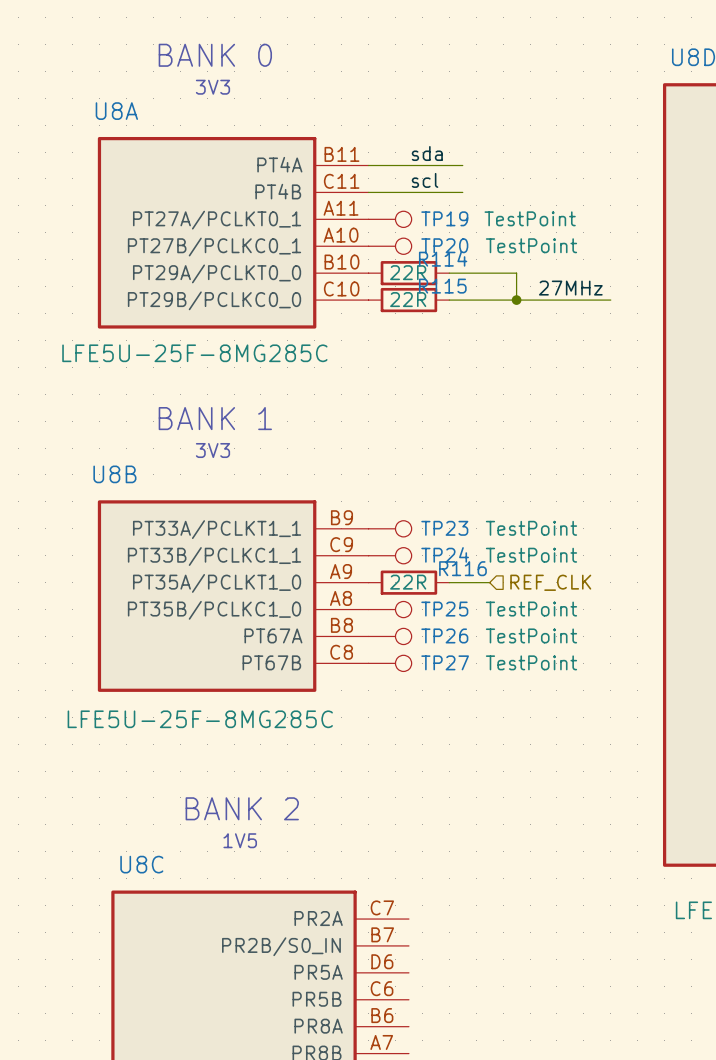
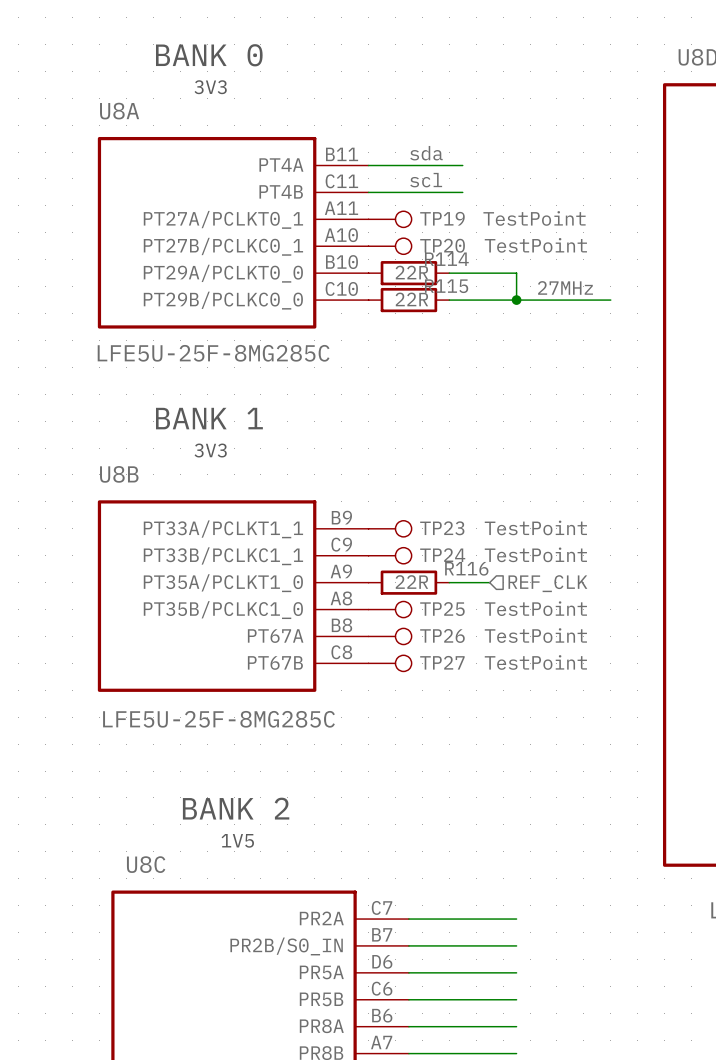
wire: none -> (408, 919) (516, 919)
wire: none -> (408, 945) (516, 945)
wire: none -> (408, 972) (516, 972)
wire: none -> (408, 999) (516, 999)
wire: none -> (408, 1026) (516, 1026)
wire: none -> (408, 1053) (516, 1053)

